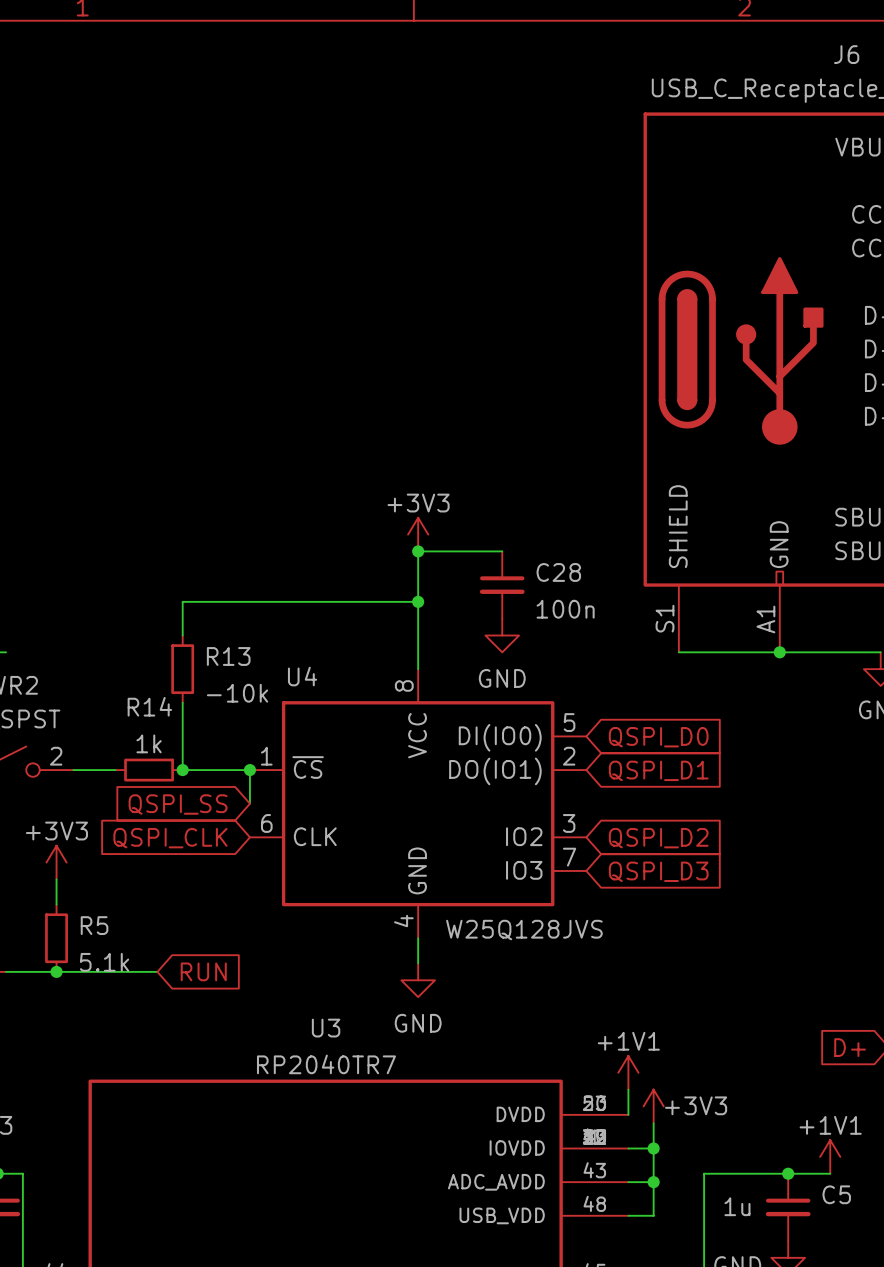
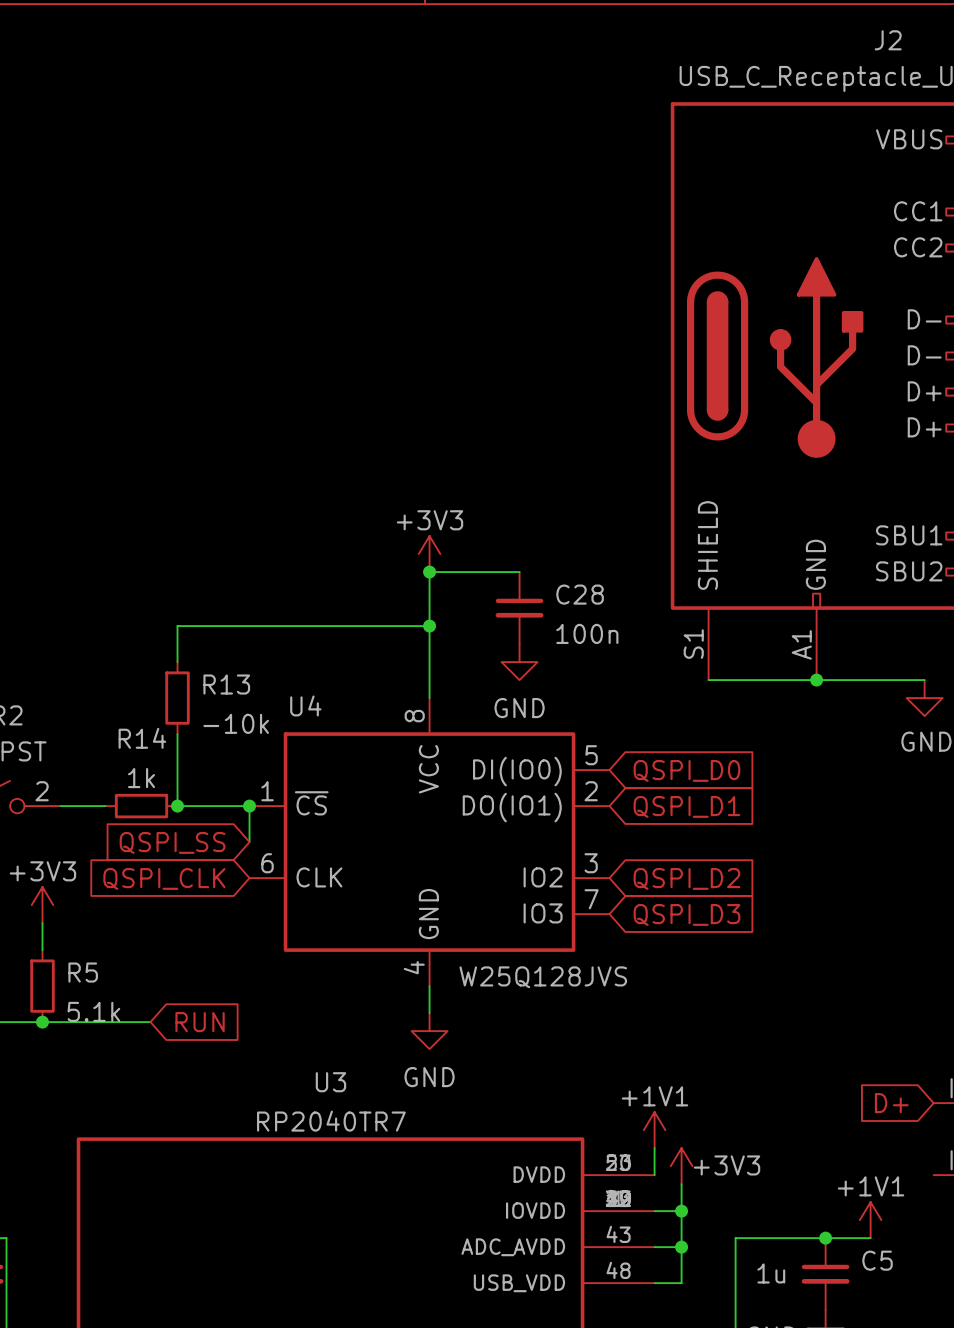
J6 name: J6 (846, 54) -> J2 (888, 40)

